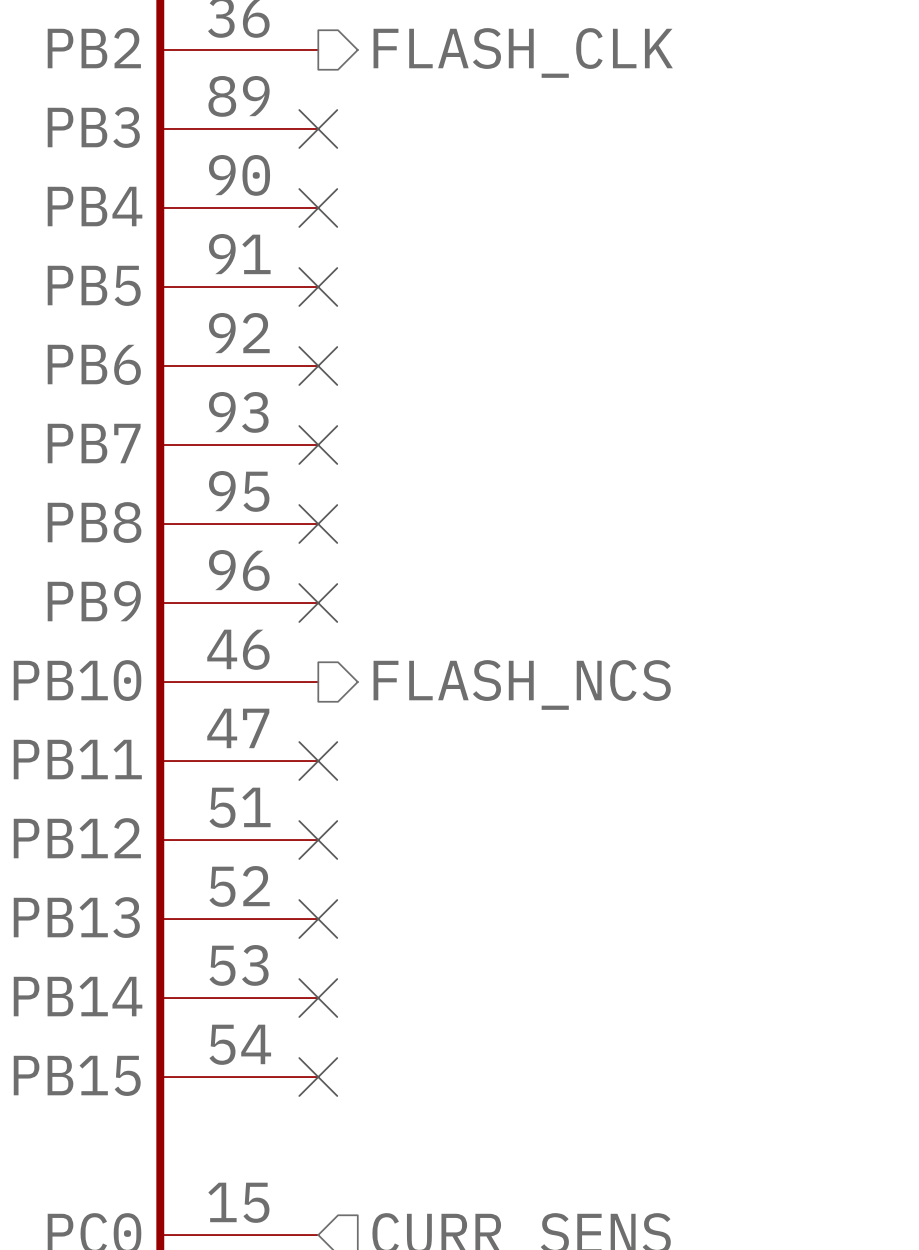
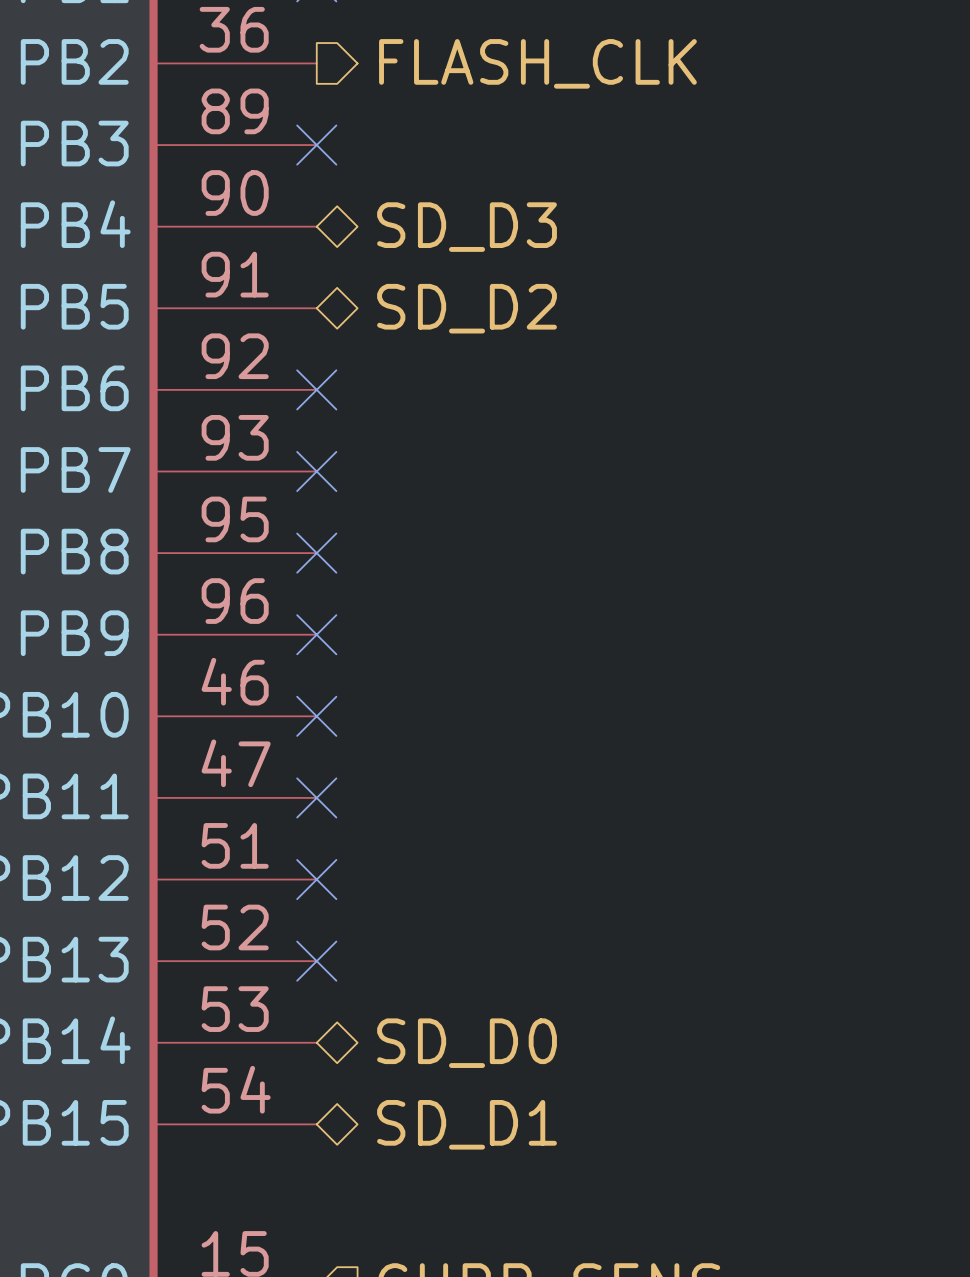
no-connect mark: (318, 208) -> none
hierarchical label: none -> SD_D3 (467, 227)
no-connect mark: (318, 287) -> none
hierarchical label: none -> SD_D2 (467, 308)
no-connect mark: none -> (316, 716)
hierarchical label: FLASH_NCS (522, 684) -> none
no-connect mark: (318, 998) -> none
hierarchical label: none -> SD_D0 (467, 1043)
no-connect mark: (318, 1077) -> none
hierarchical label: none -> SD_D1 (467, 1124)

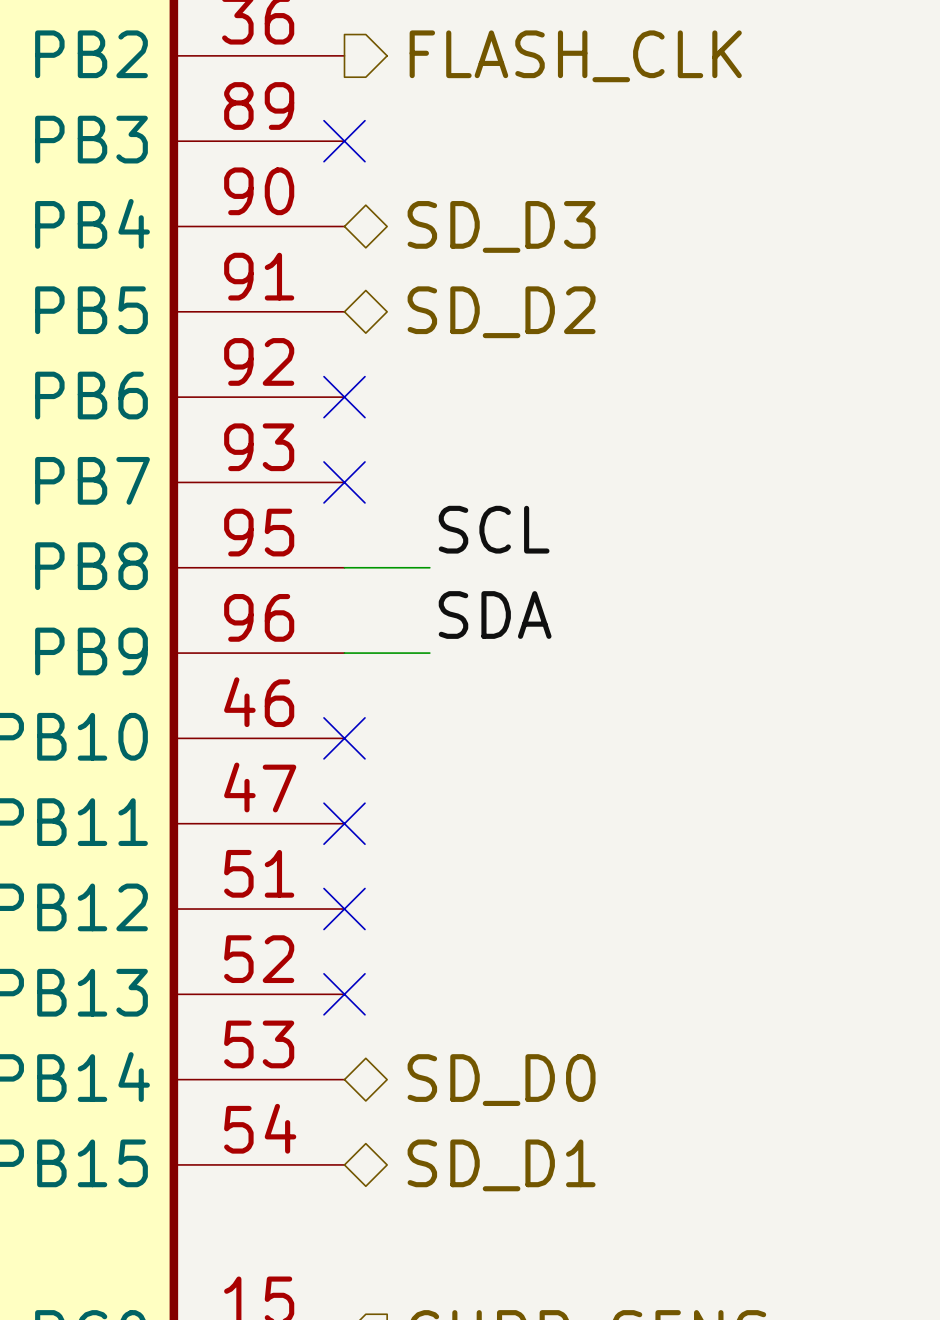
label: none -> SCL (494, 529)
wire: none -> (344, 567) (429, 567)
no-connect mark: (316, 553) -> none
label: none -> SDA (495, 615)
wire: none -> (344, 653) (429, 653)
no-connect mark: (316, 634) -> none

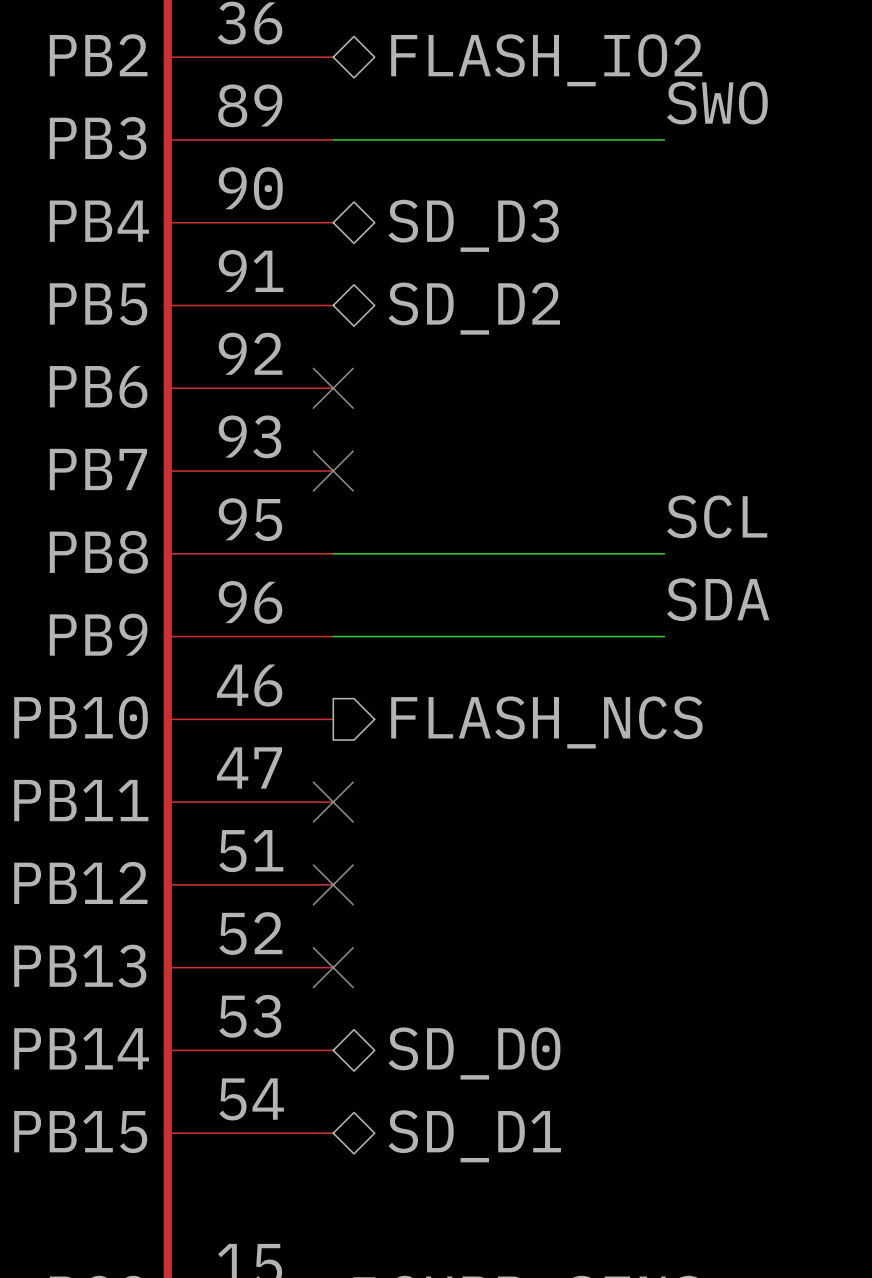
hierarchical label shape: output (575, 56) -> bidirectional (546, 60)
hierarchical label: FLASH_CLK (575, 56) -> FLASH_IO2 (546, 60)
label: none -> SWO (717, 103)
wire: none -> (333, 139) (664, 139)
no-connect mark: (344, 141) -> none
label position: SCL (494, 529) -> SCL (717, 516)
wire: none -> (416, 553) (664, 553)
label position: SDA (495, 615) -> SDA (718, 599)
wire: none -> (416, 636) (664, 636)
no-connect mark: (344, 738) -> none
hierarchical label: none -> FLASH_NCS (546, 722)

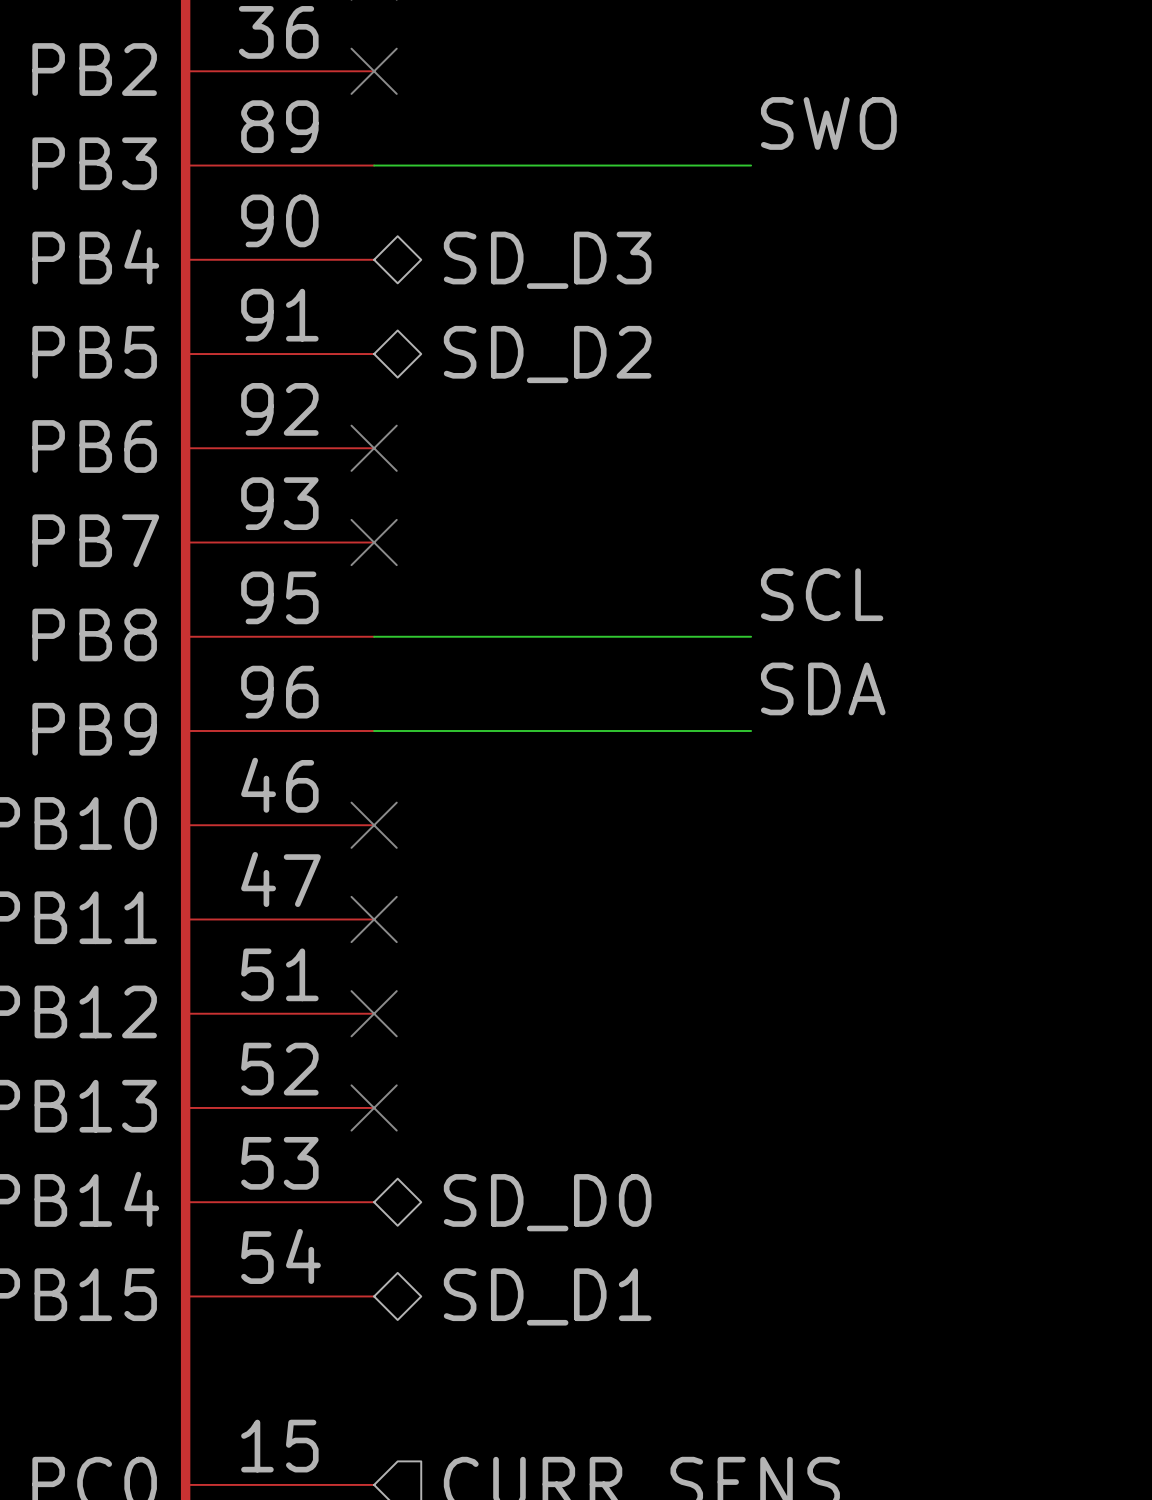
no-connect mark: none -> (374, 71)
hierarchical label: FLASH_IO2 (546, 60) -> none
no-connect mark: none -> (374, 825)
hierarchical label: FLASH_NCS (546, 722) -> none

